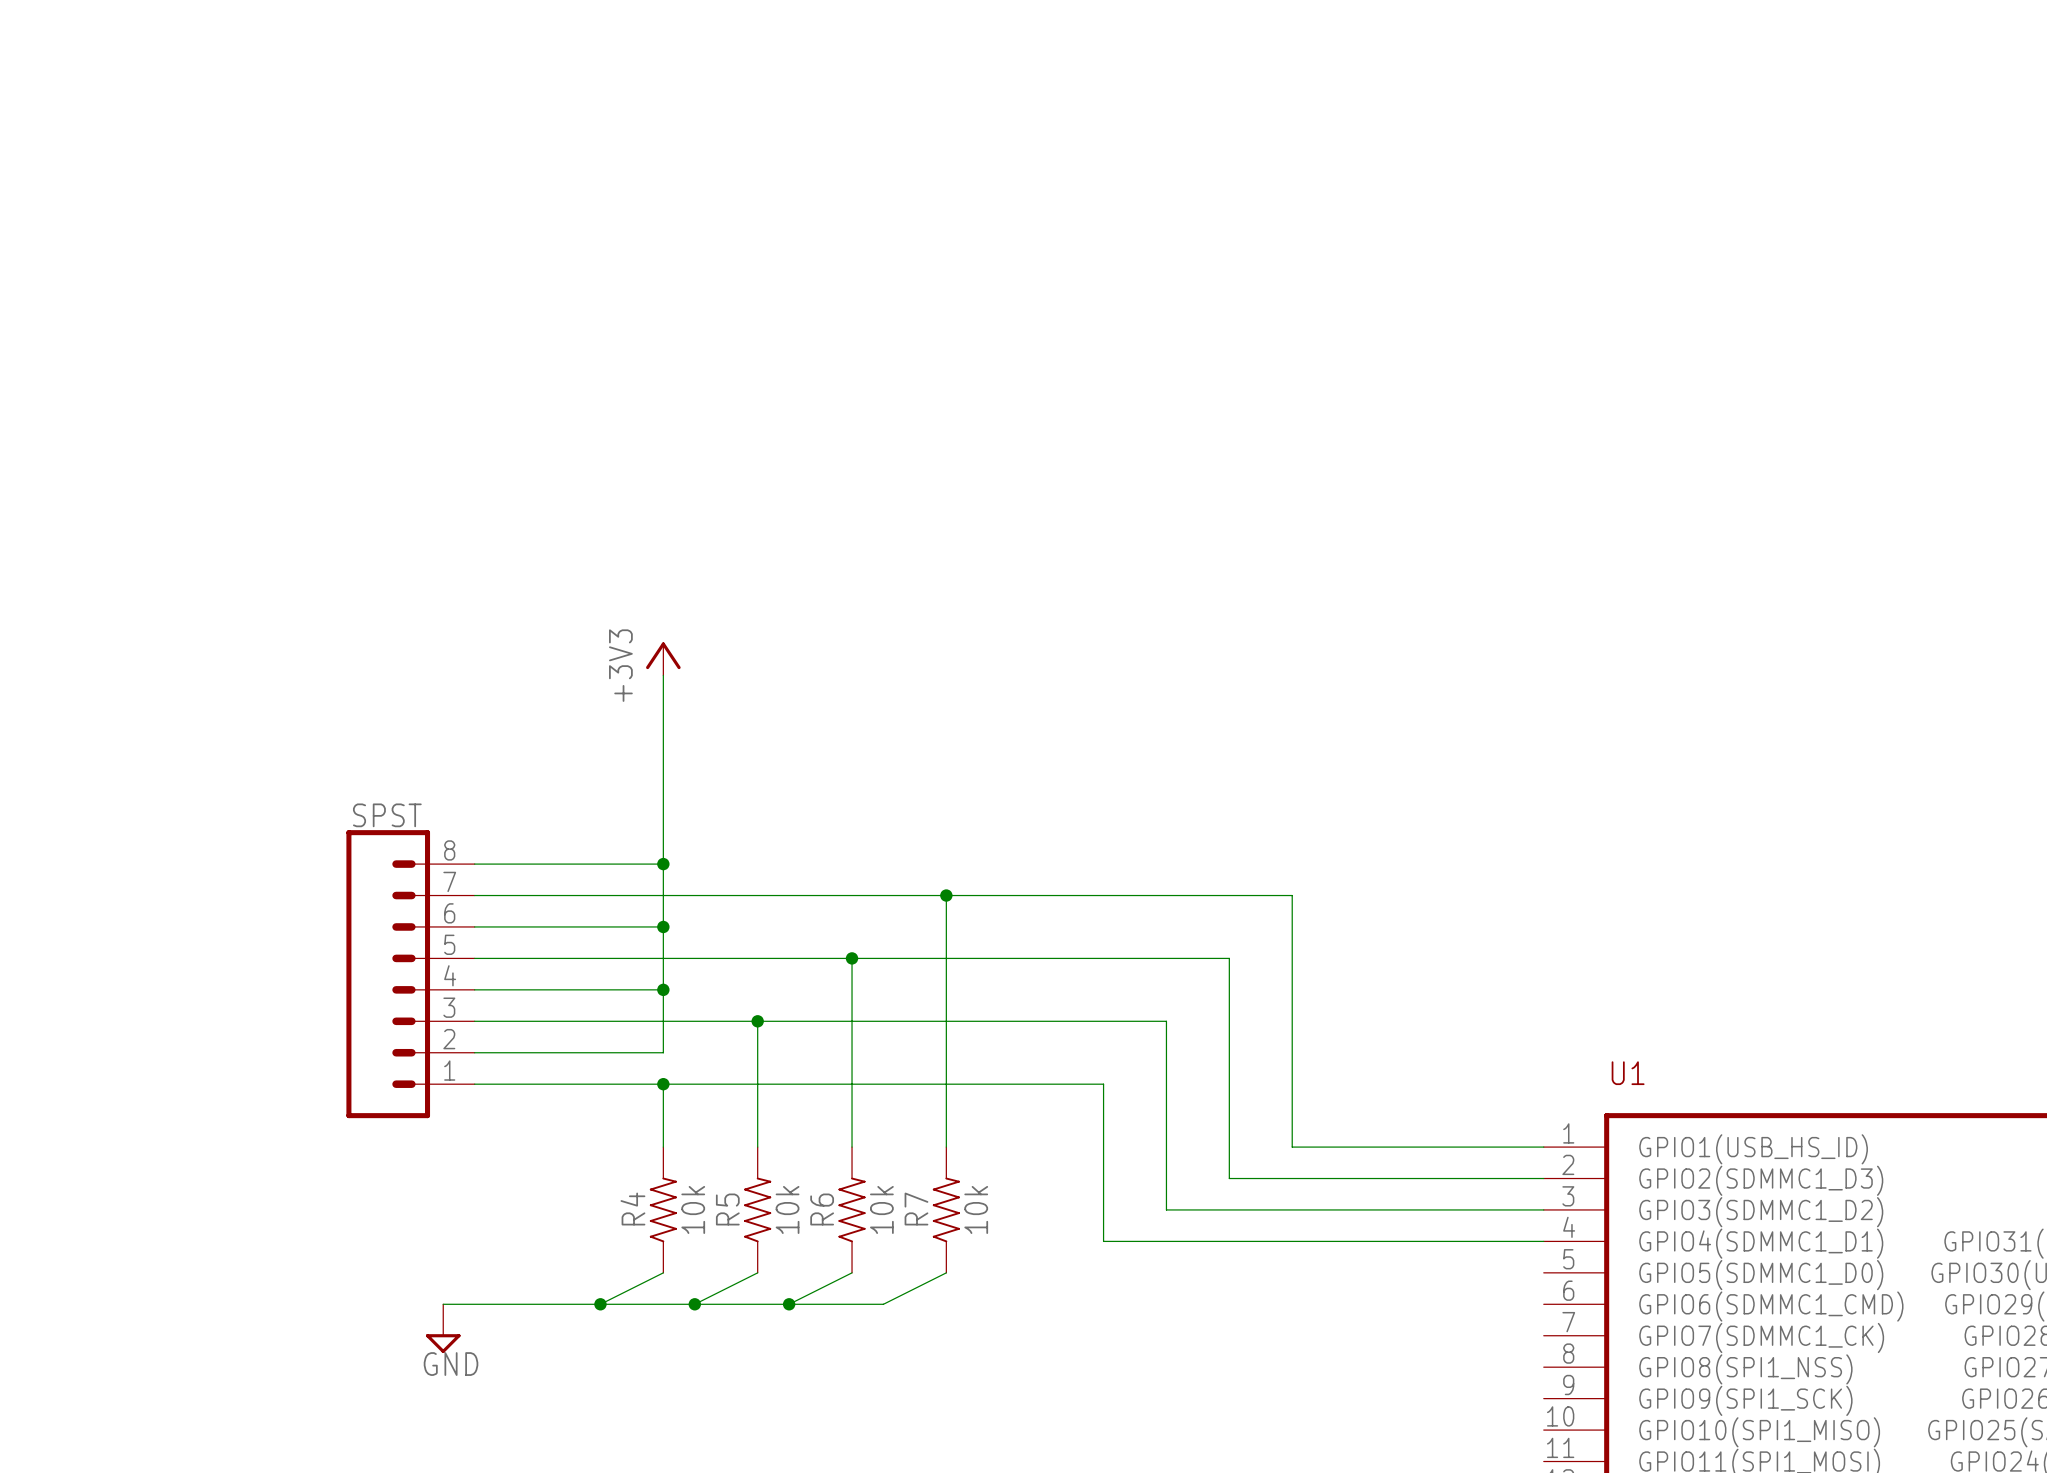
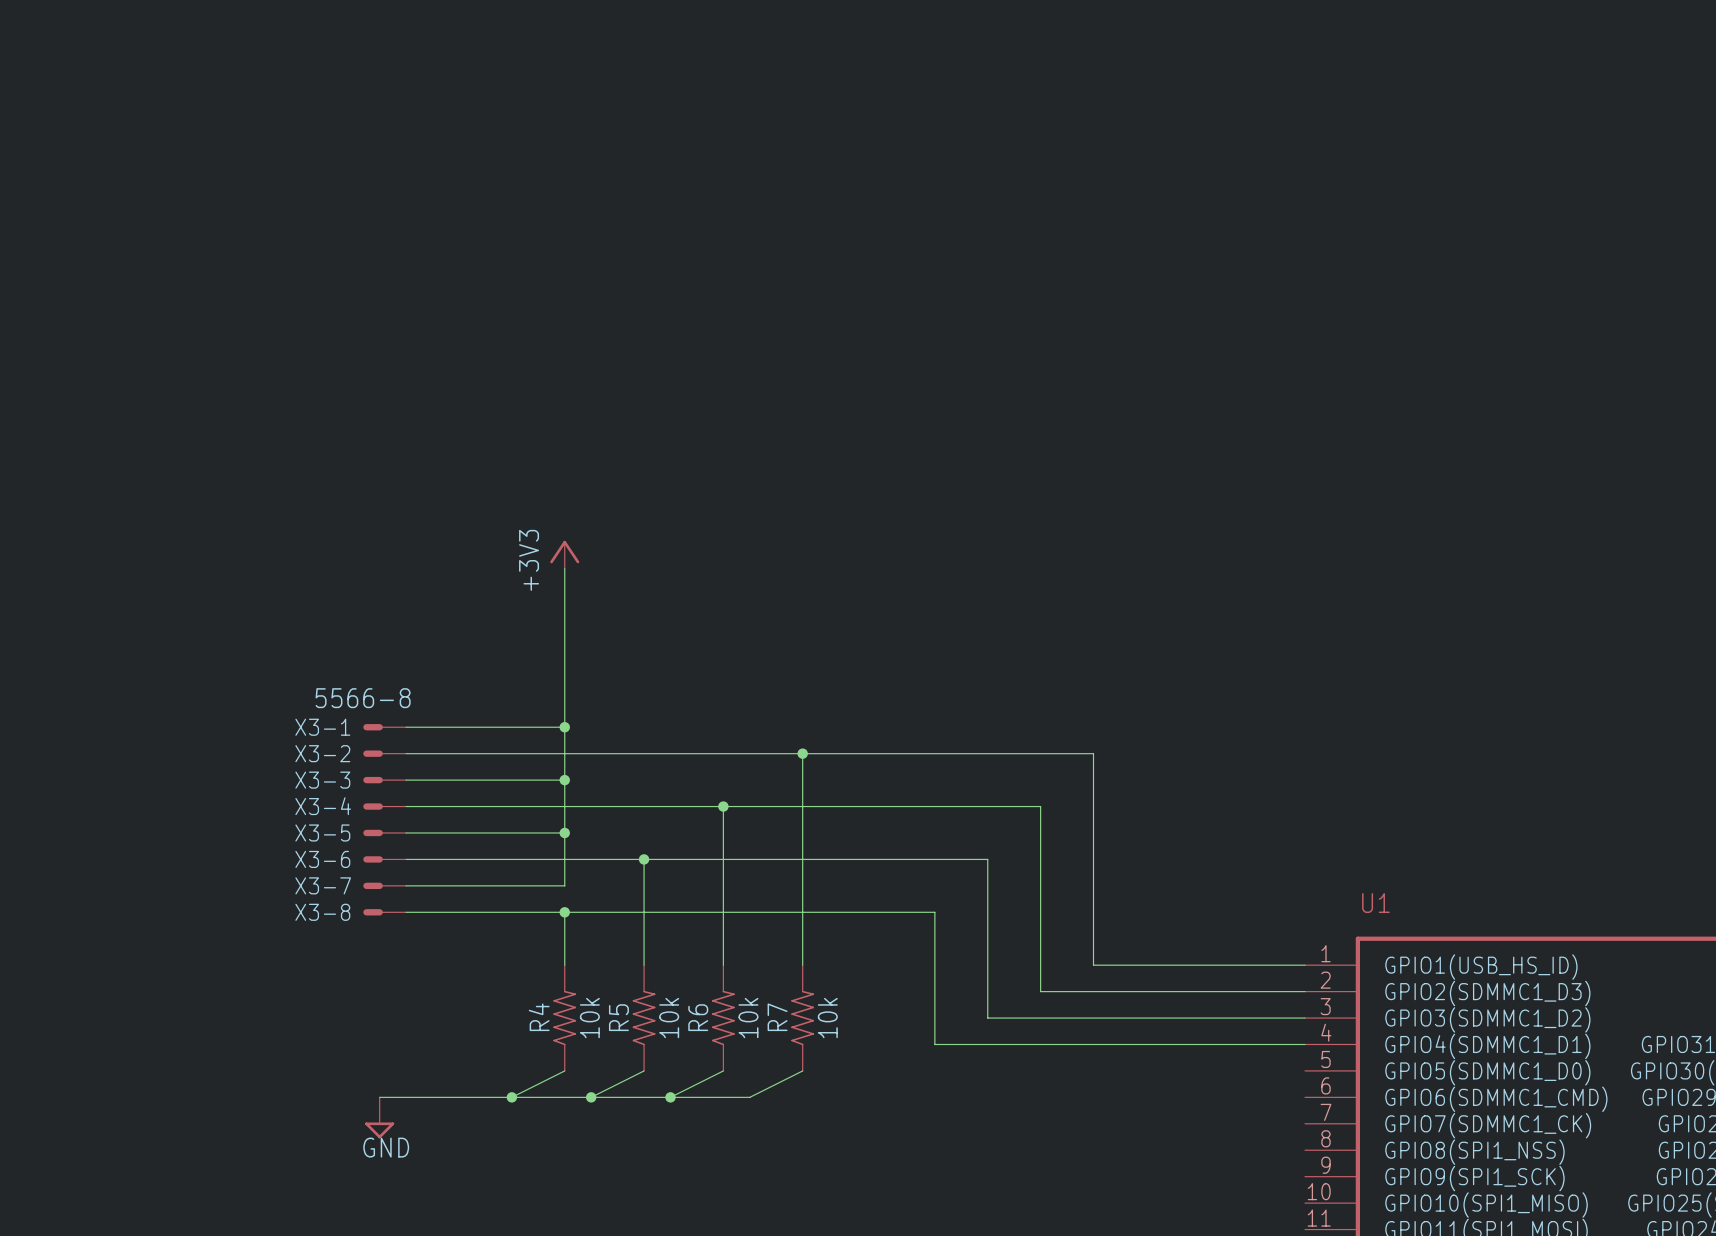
X3-1: none -> 5566-8 (384, 727)
X3-2: none -> (384, 753)
X3-3: none -> (384, 780)
X3-4: none -> (384, 806)
SPST: (410, 974) -> none
X3-5: none -> (384, 832)
X3-6: none -> (384, 859)
X3-7: none -> (384, 885)
X3-8: none -> (384, 912)

